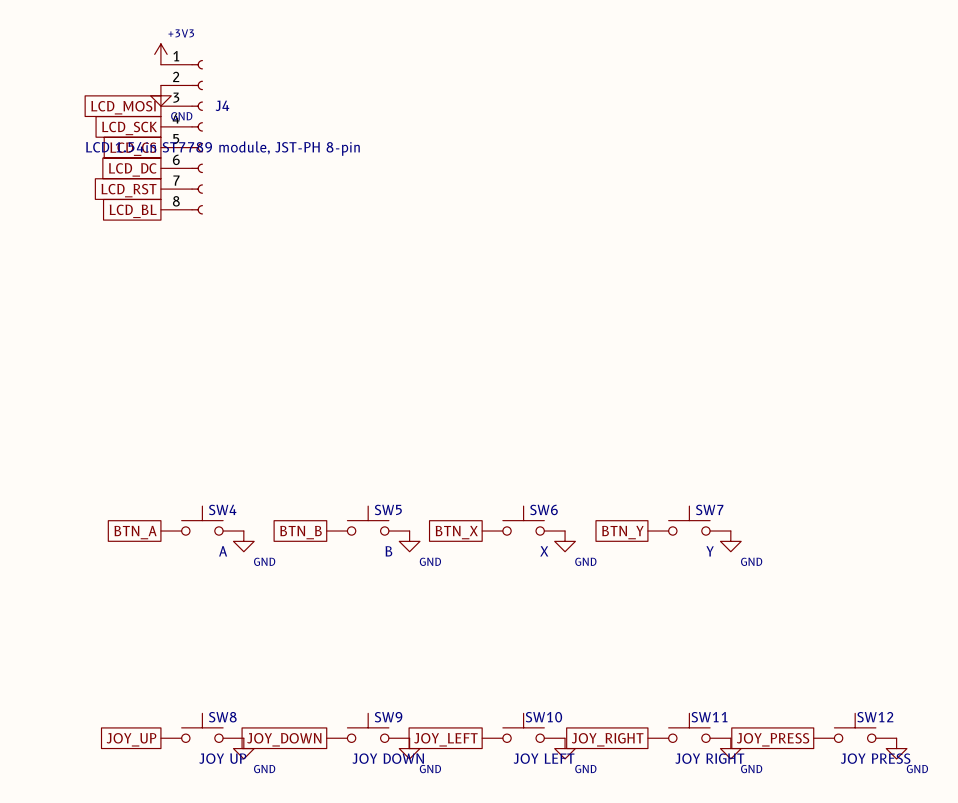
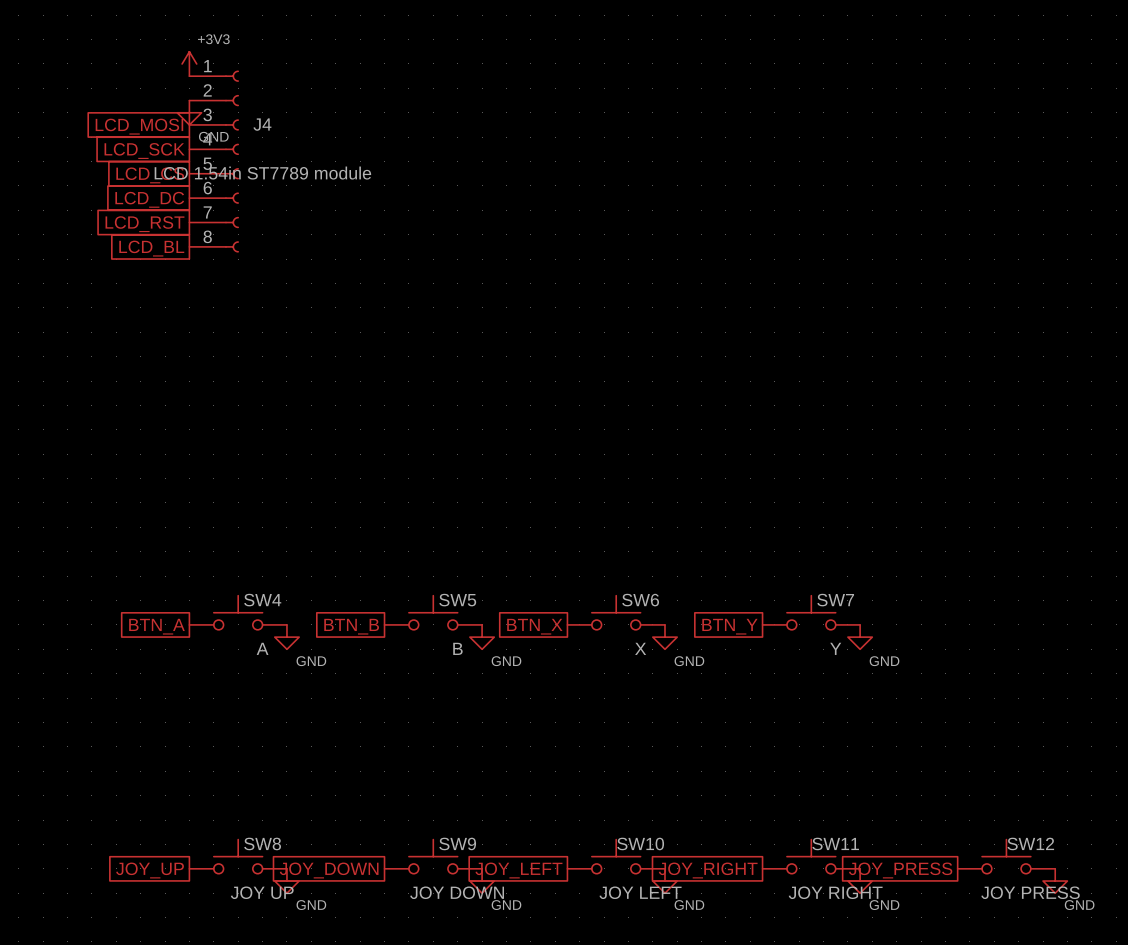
J4 value: LCD 1.54in ST7789 module, JST-PH 8-pin (222, 148) -> LCD 1.54in ST7789 module (262, 173)

